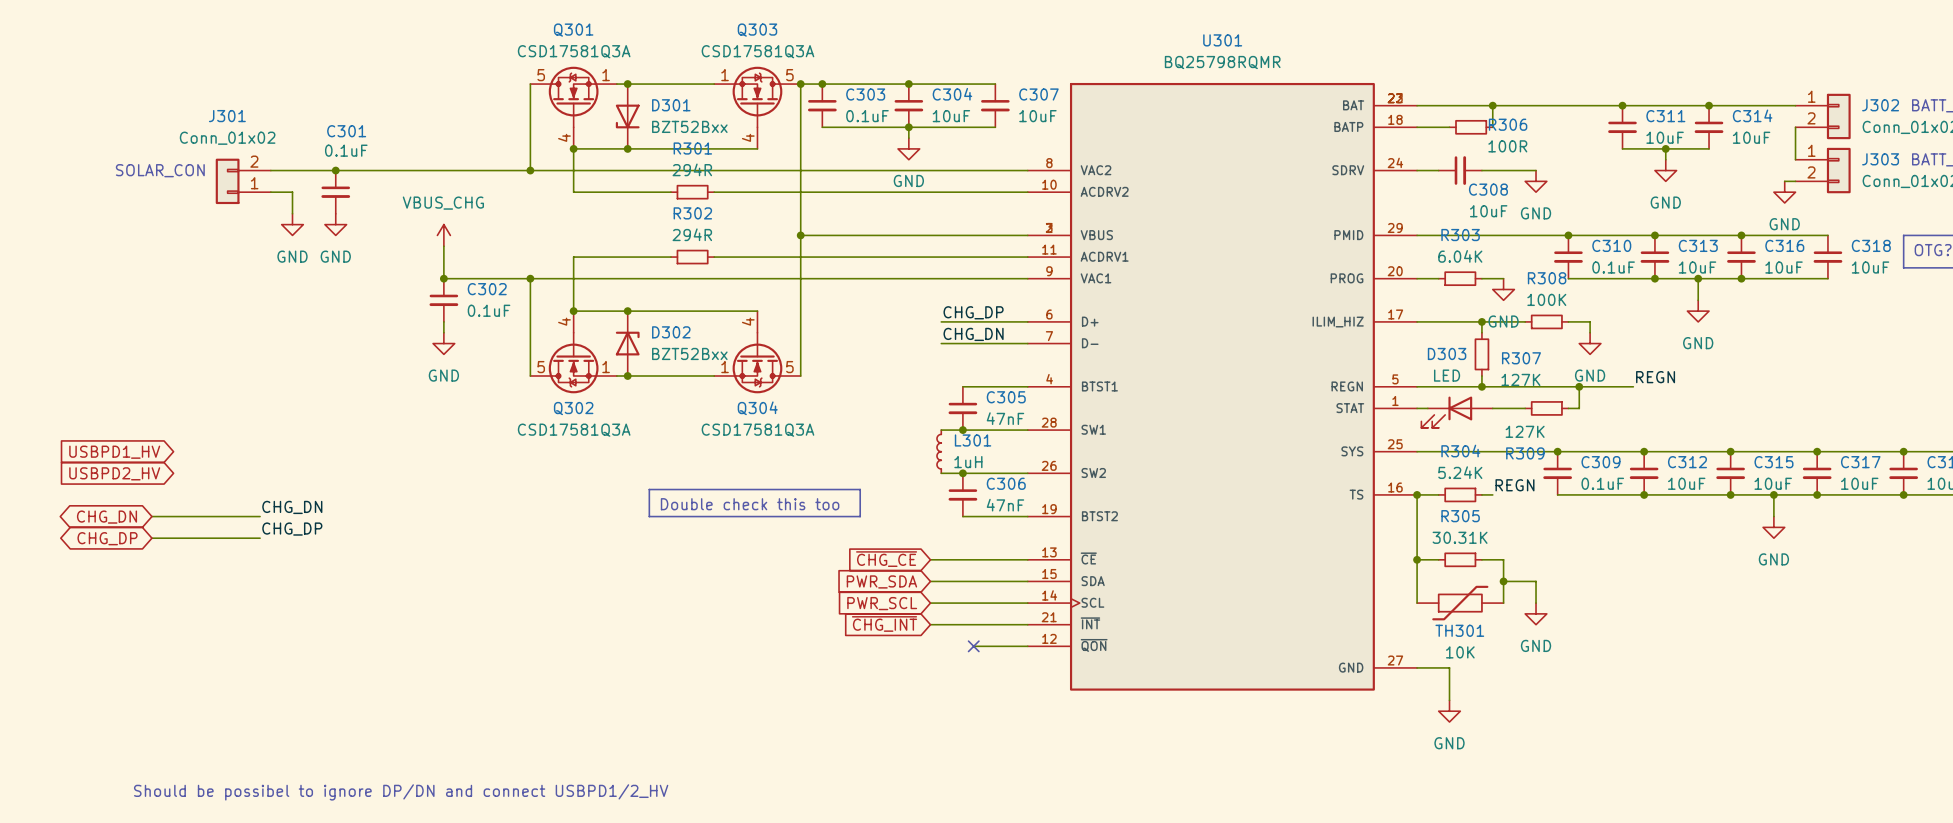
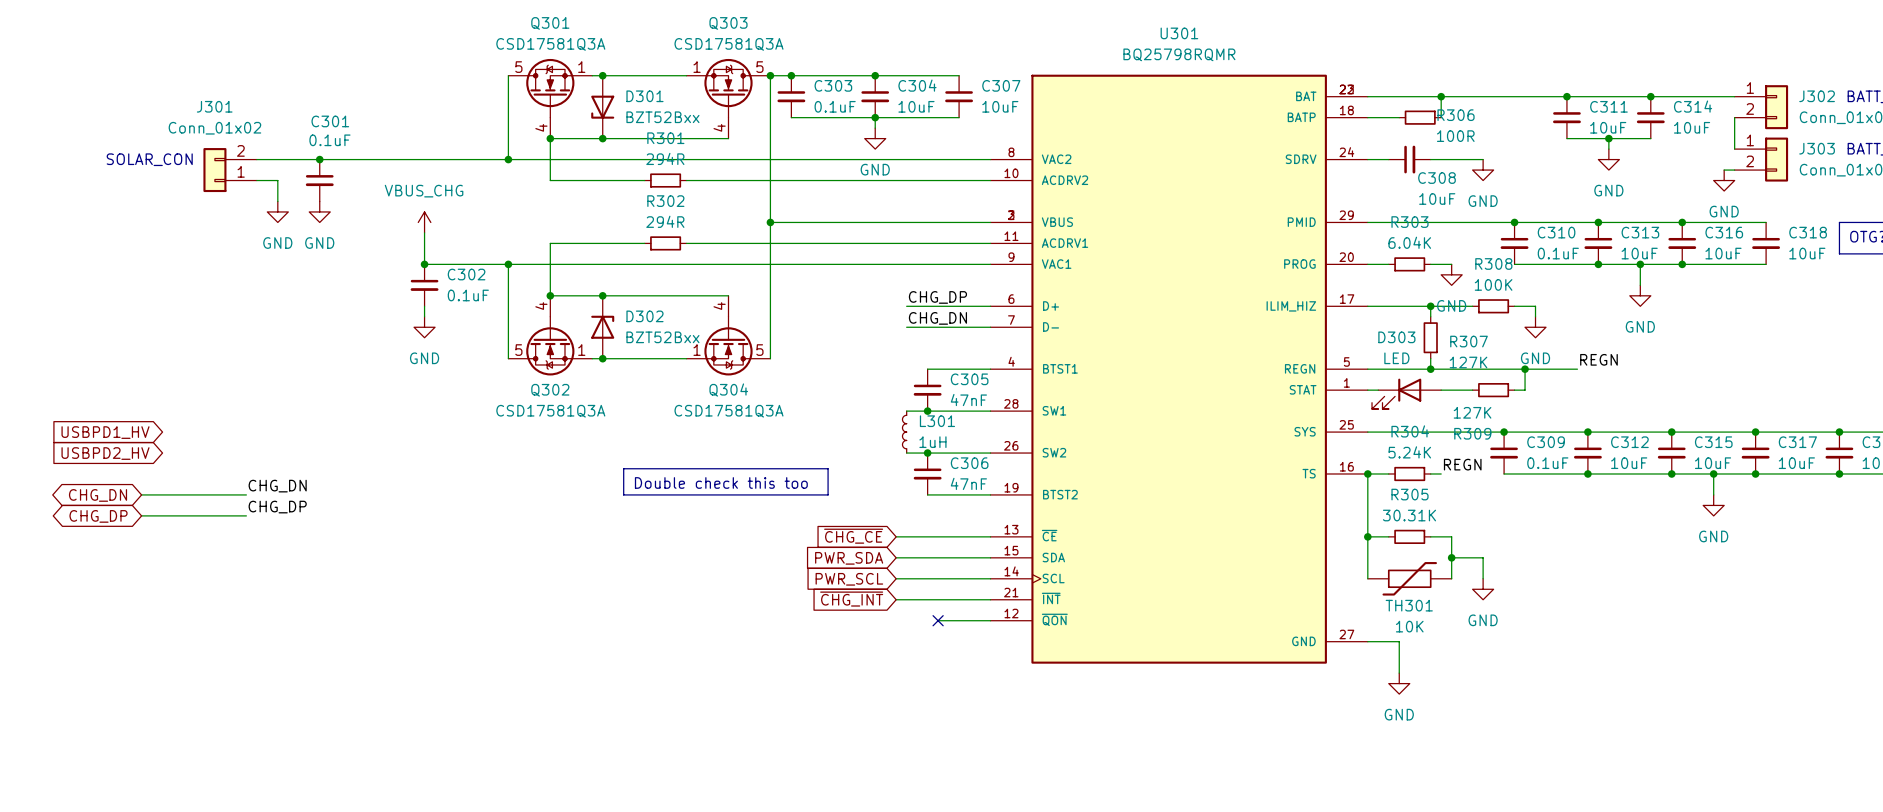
text: Should be possibel to ignore DP/DN and connect USBPD1/2_HV (401, 792) -> none

